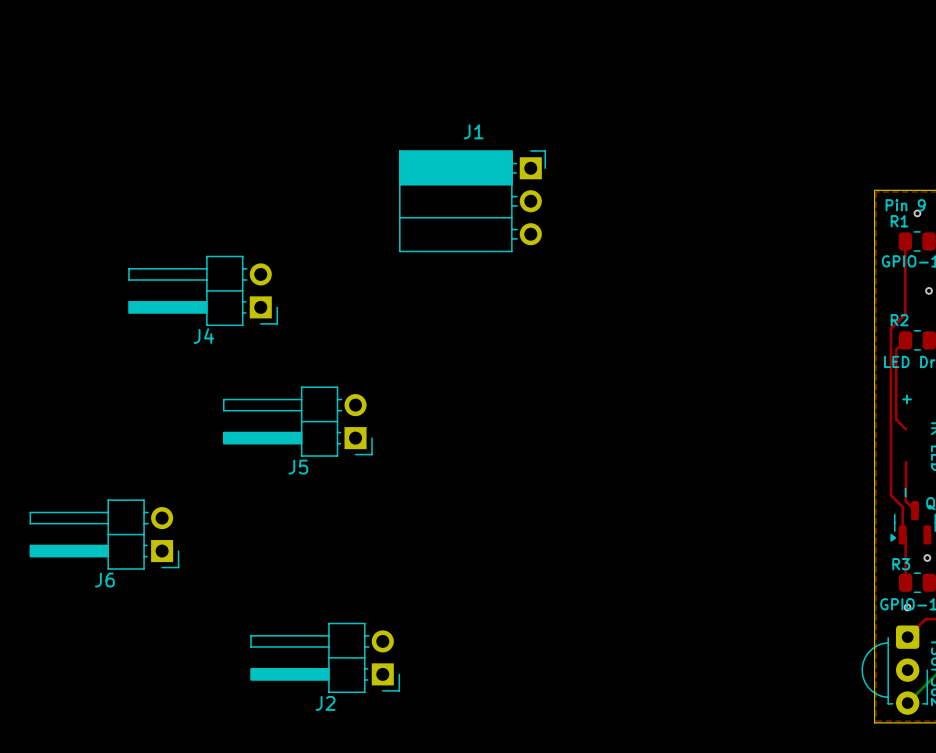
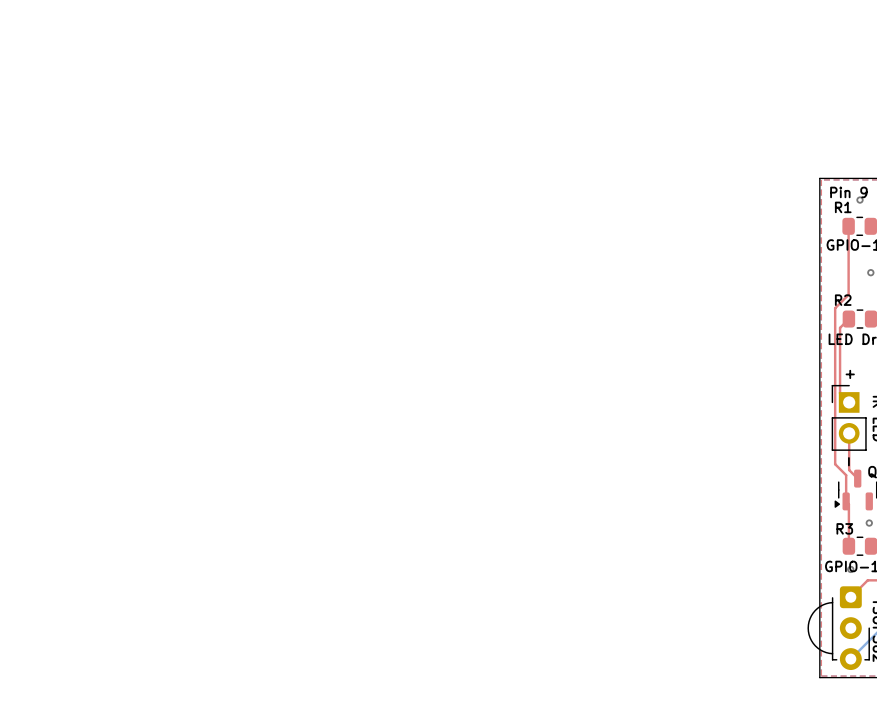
J1: (472, 201) -> none
J4: (203, 290) -> none
J5: (297, 421) -> none
part: none -> (849, 417)
J6: (104, 534) -> none
J2: (325, 657) -> none

